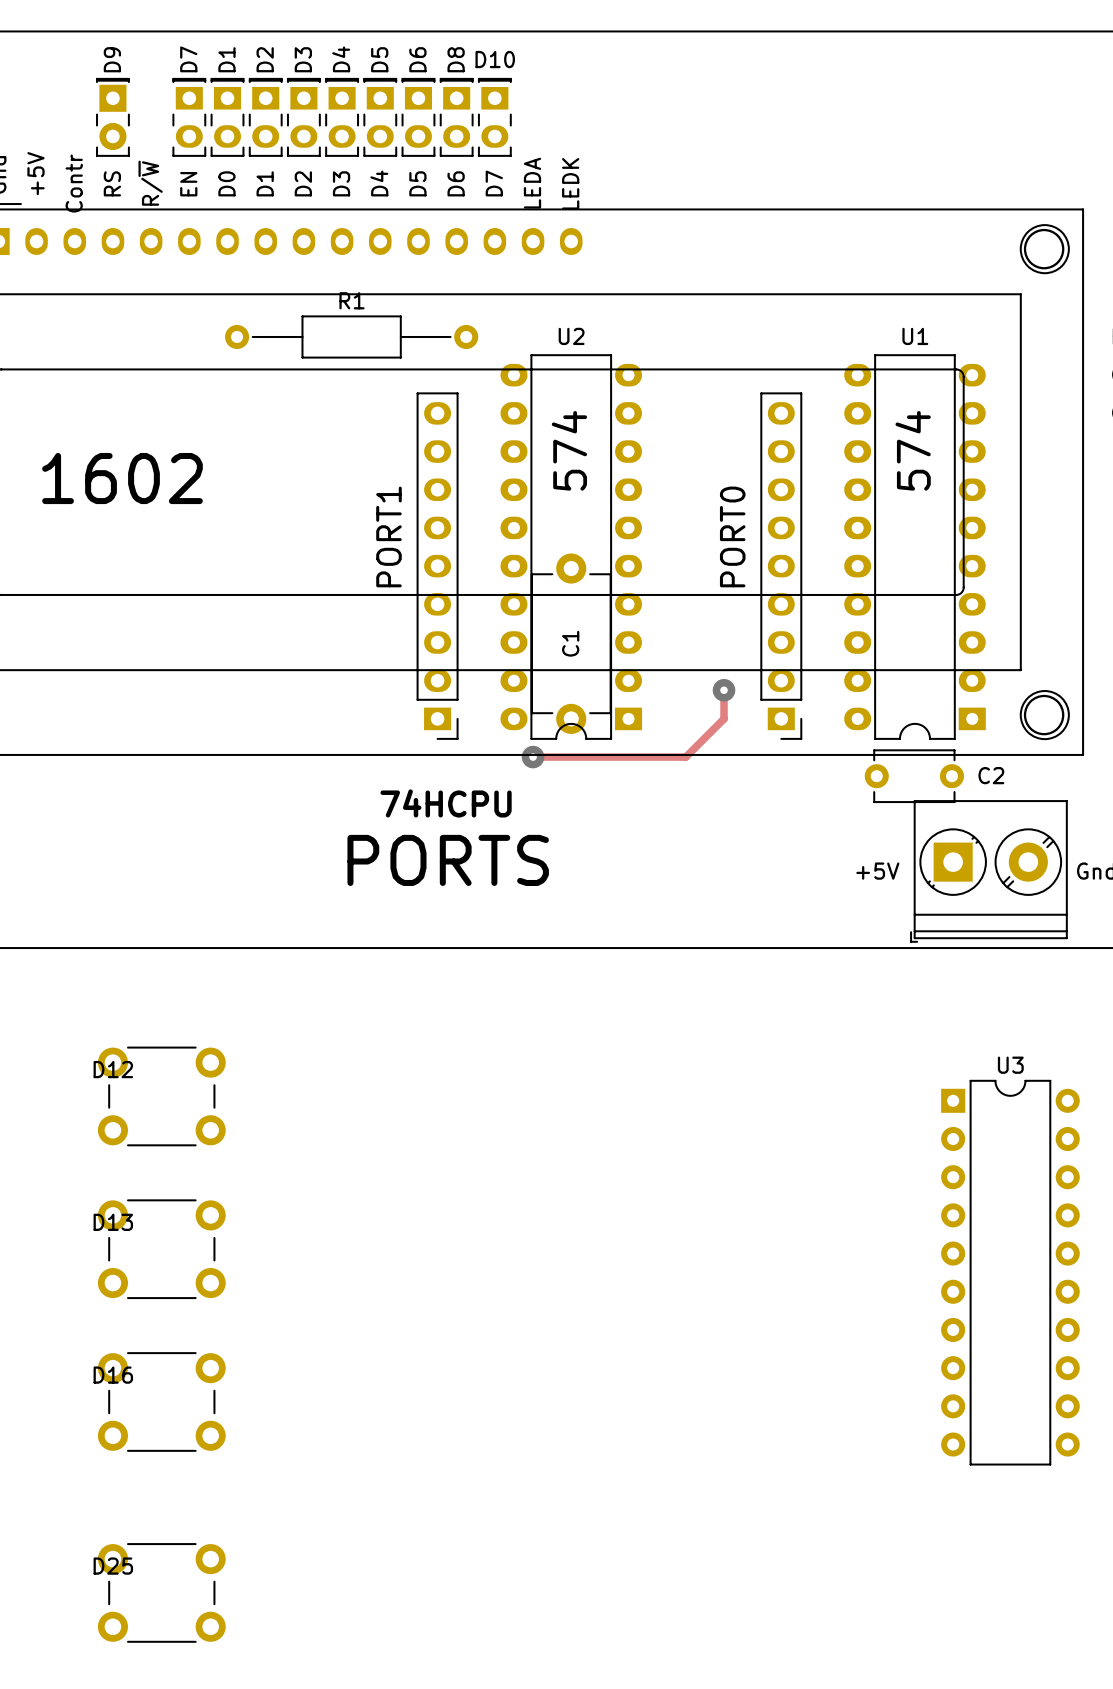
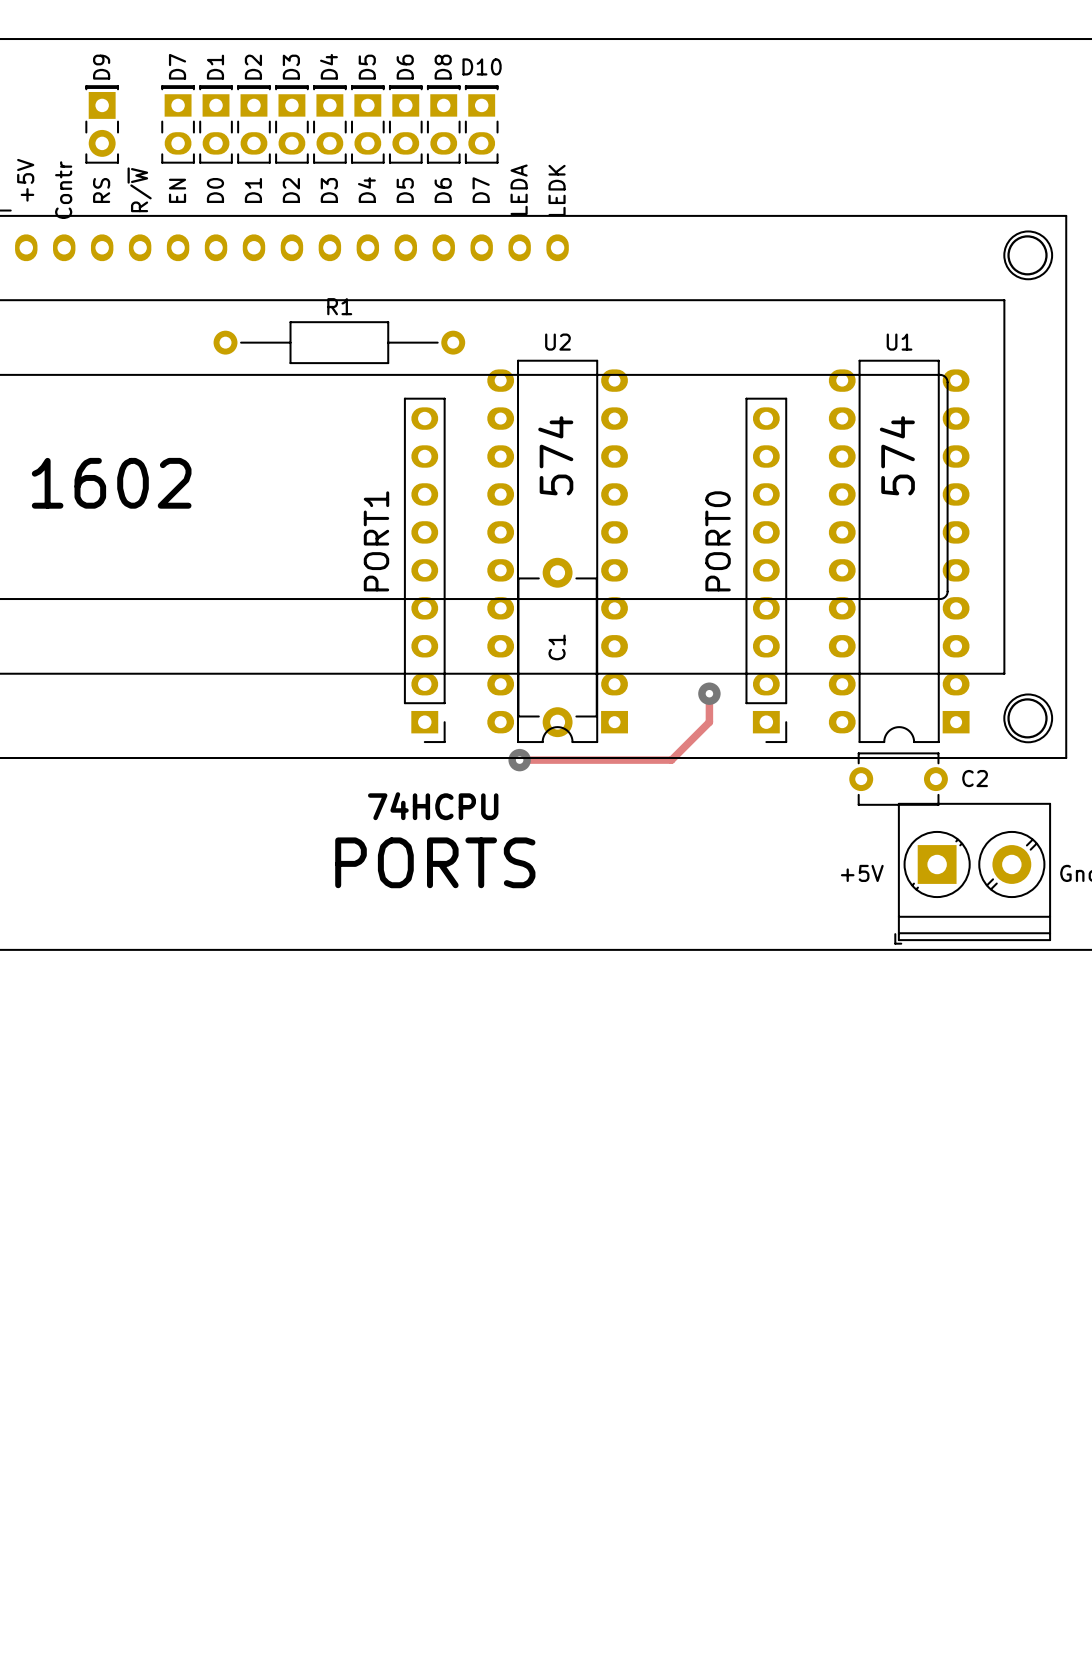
D12: (161, 1096) -> none
D13: (161, 1249) -> none
U3: (1010, 1272) -> none
D16: (161, 1401) -> none
D25: (161, 1592) -> none

